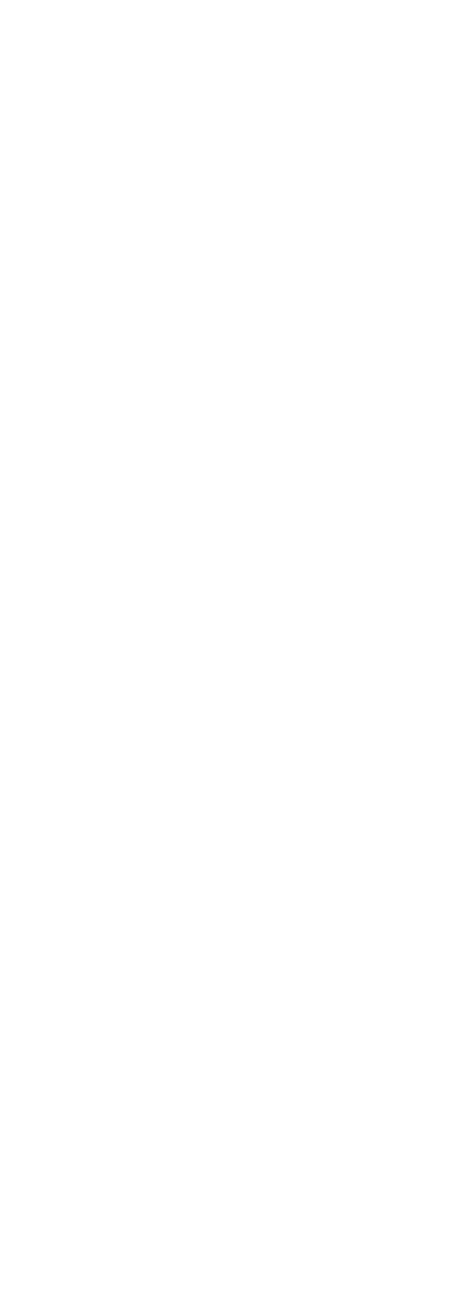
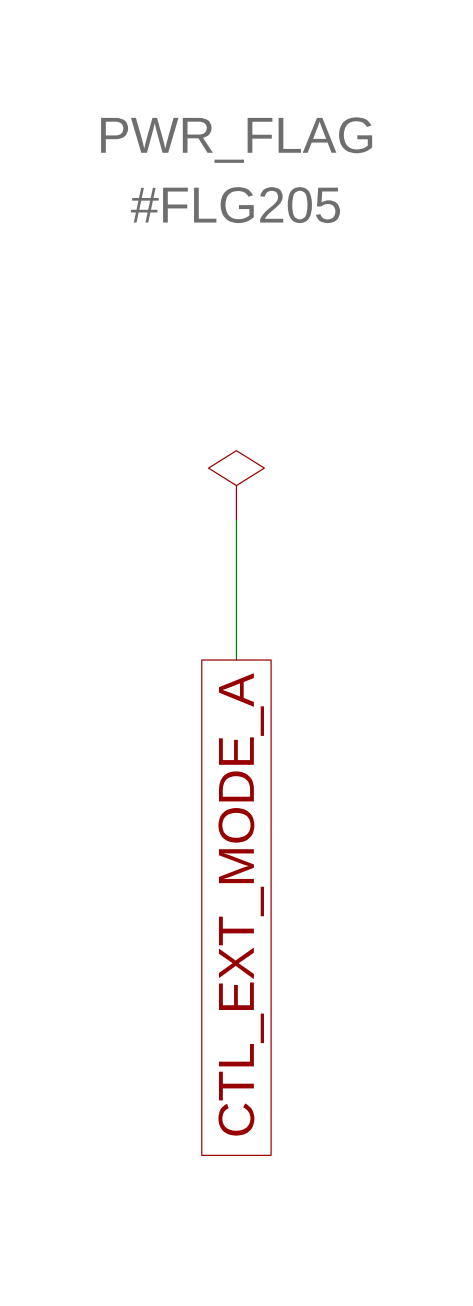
#FLG205: none -> PWR_FLAG (236, 485)
wire: none -> (236, 520) (236, 660)
global label: none -> CTL_EXT_MODE_A (241, 904)

